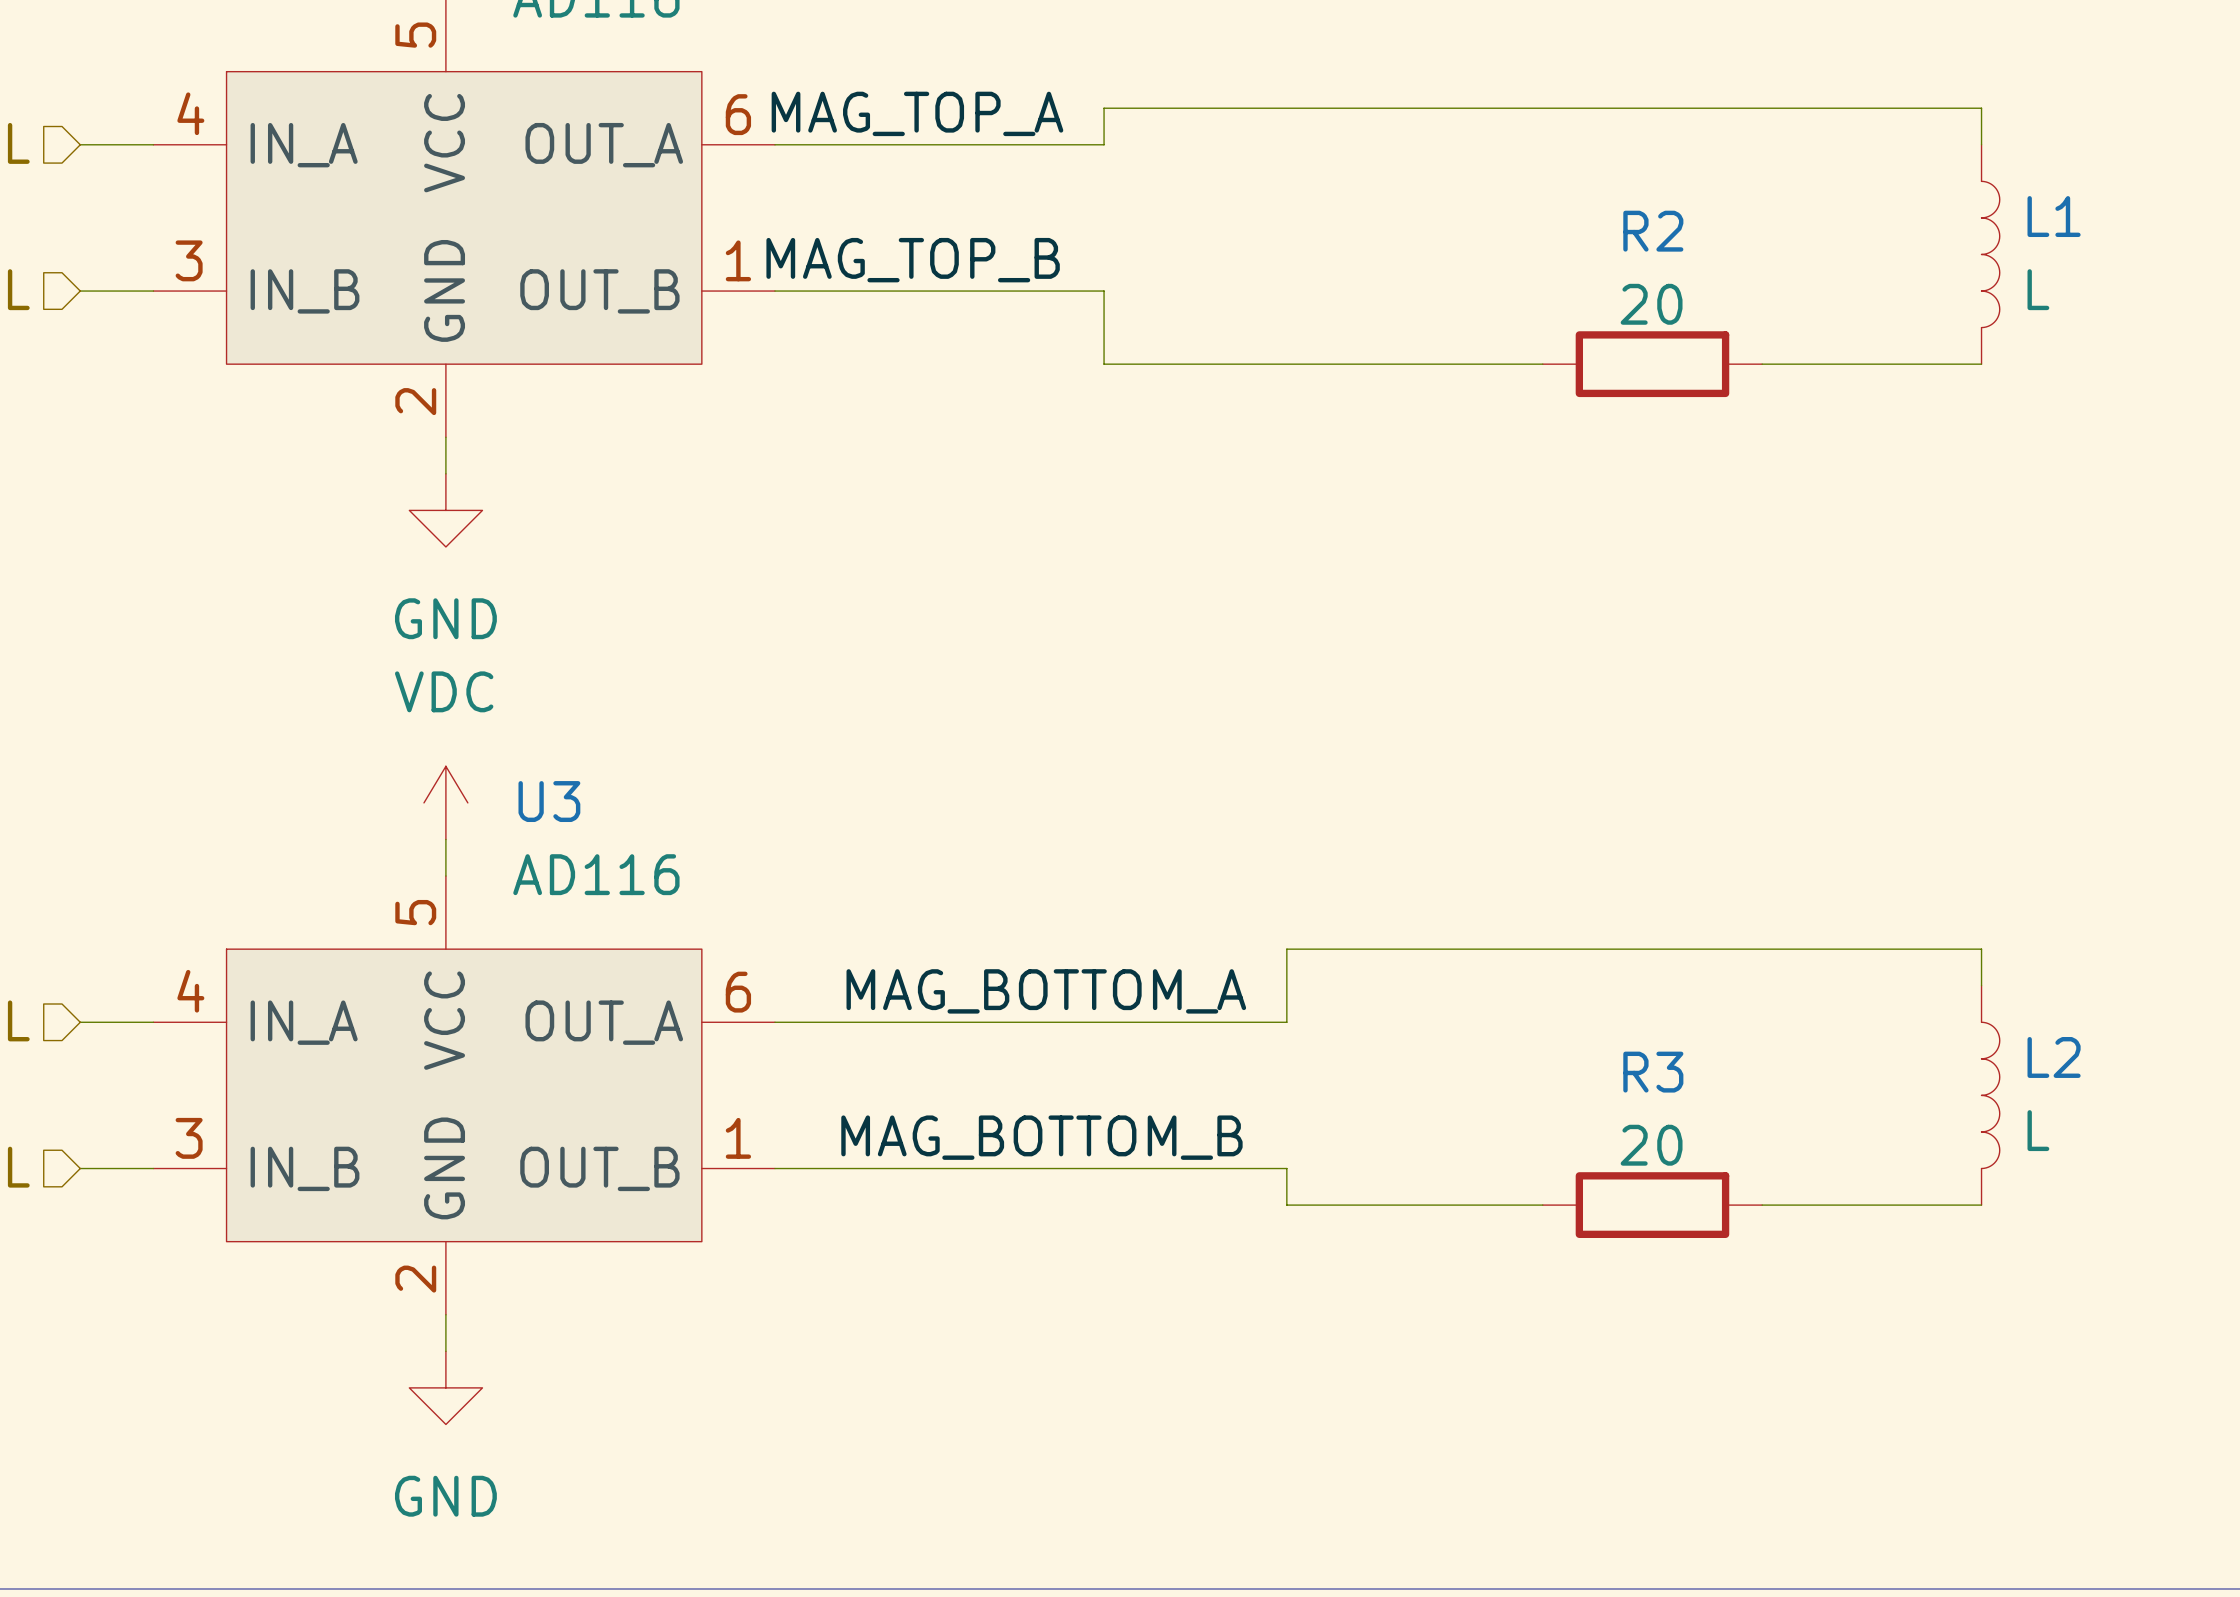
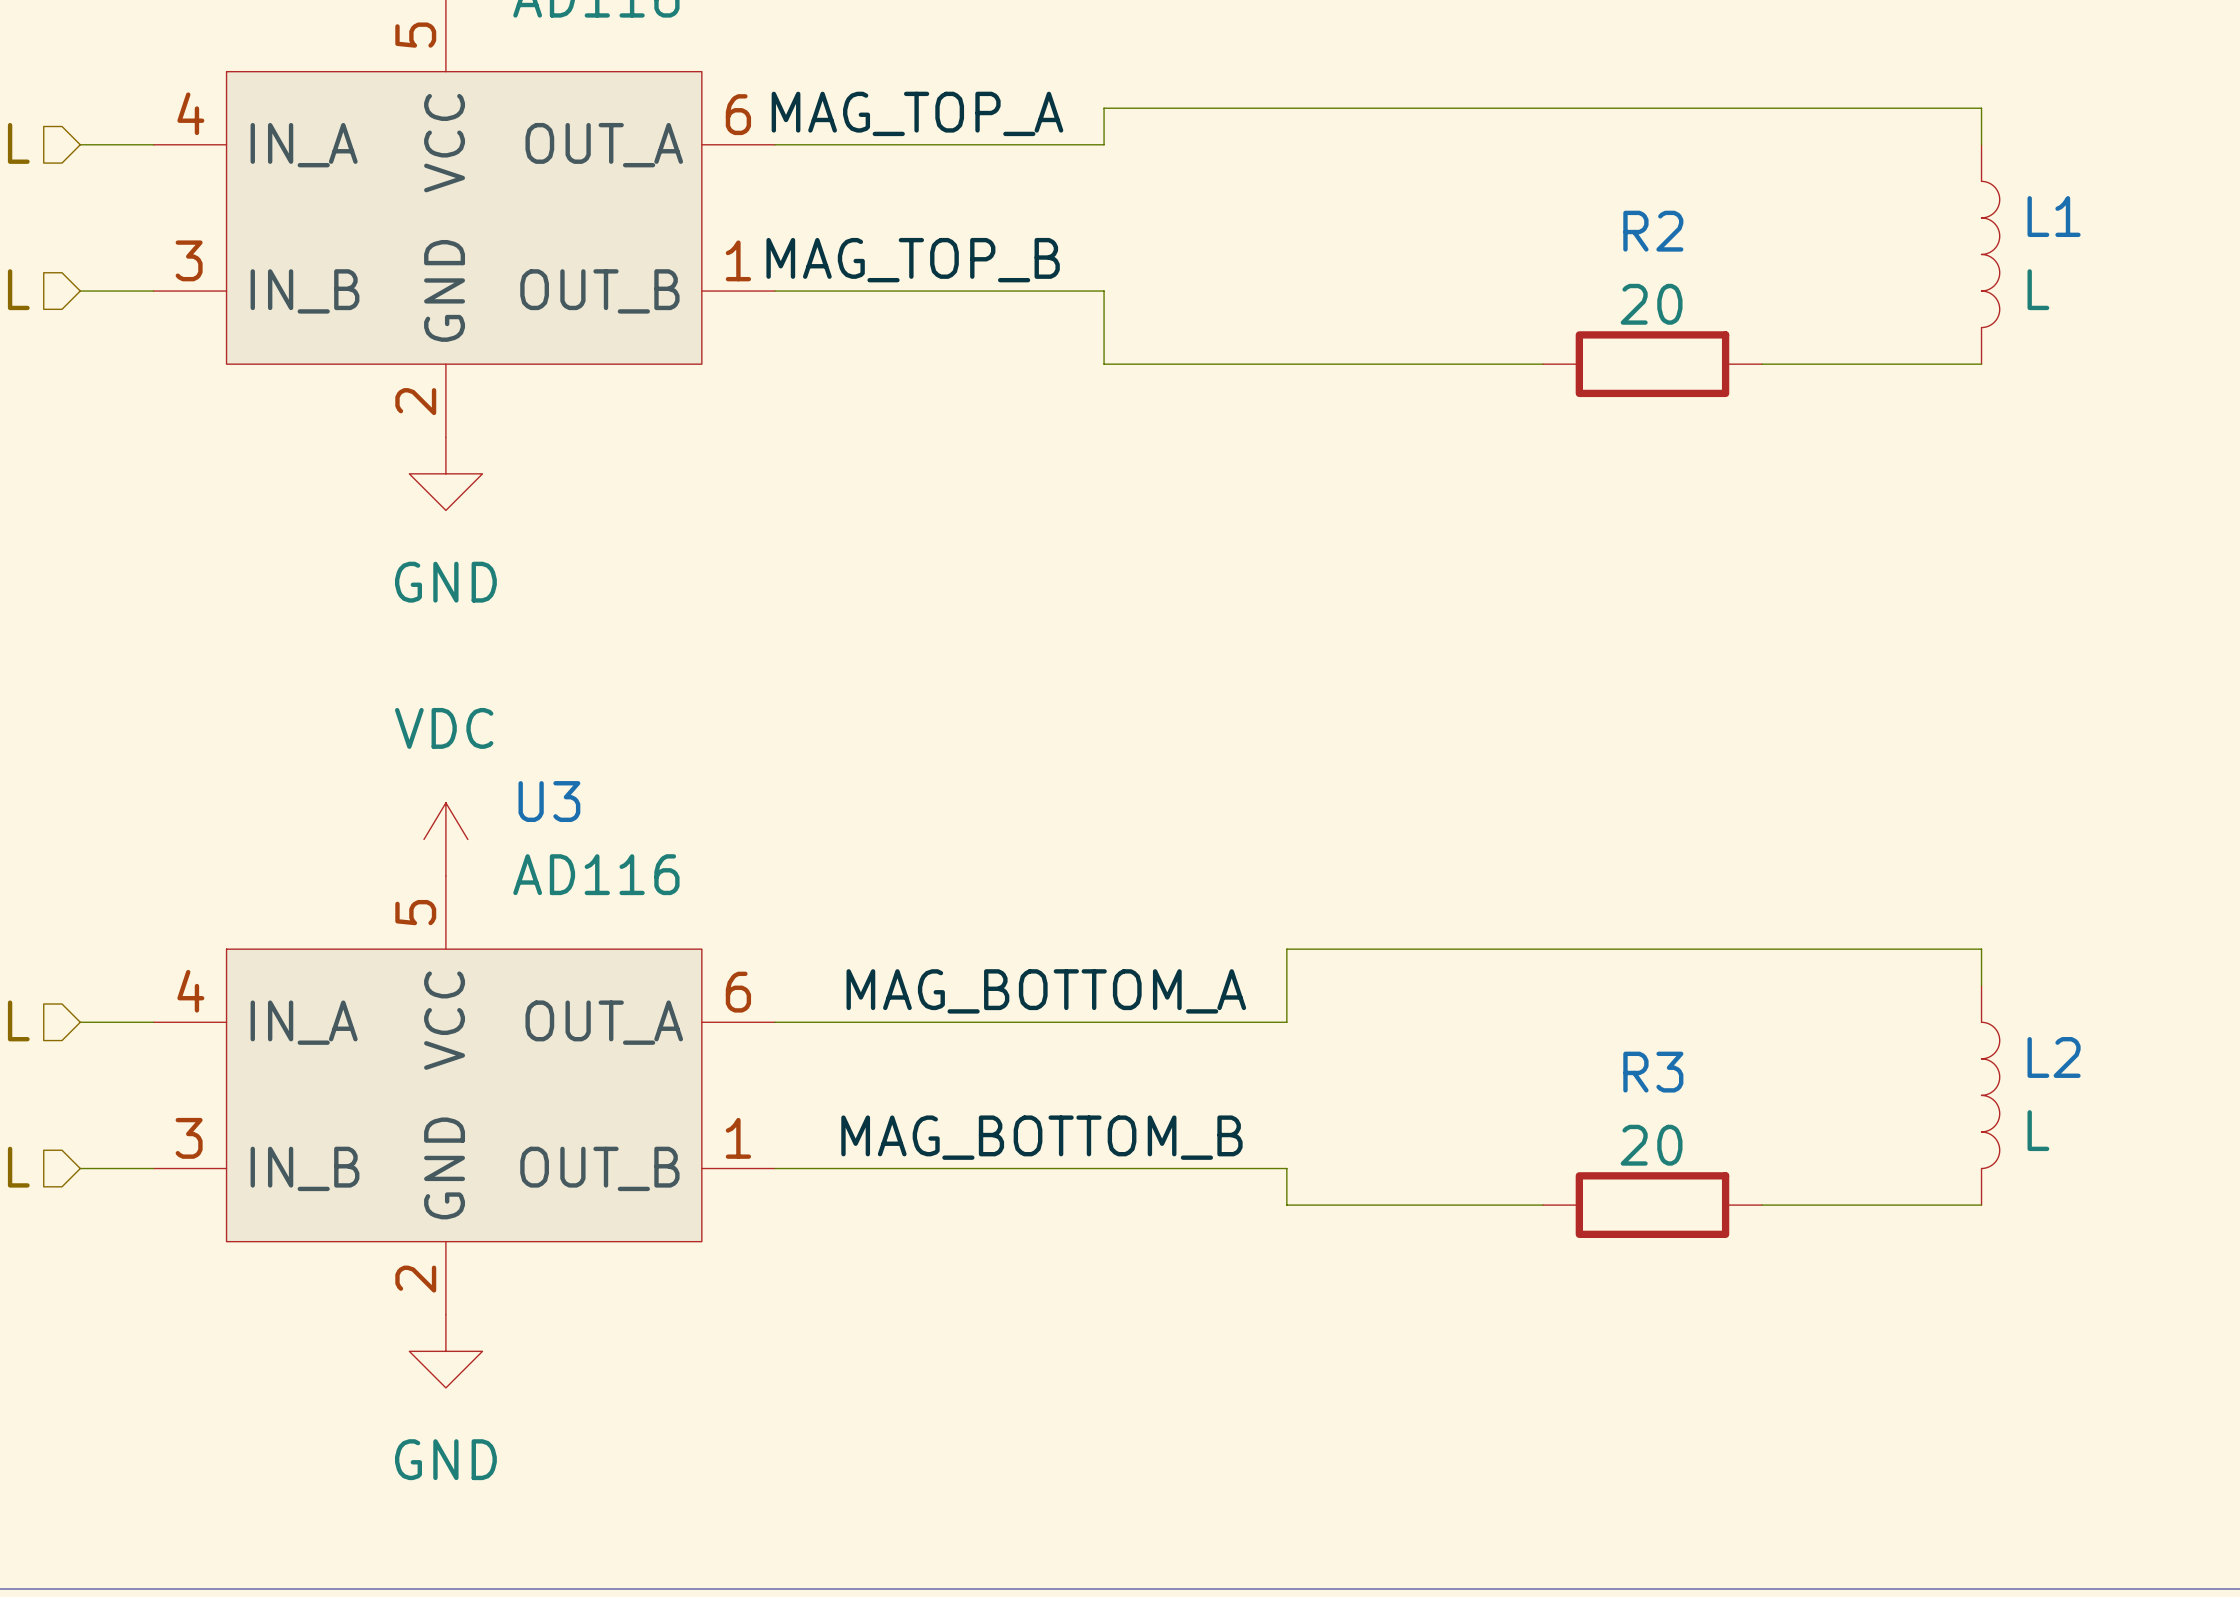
power symbol position: GND (445, 510) -> GND (445, 473)
power symbol position: VDC (445, 802) -> VDC (445, 839)
power symbol position: GND (445, 1387) -> GND (445, 1351)

